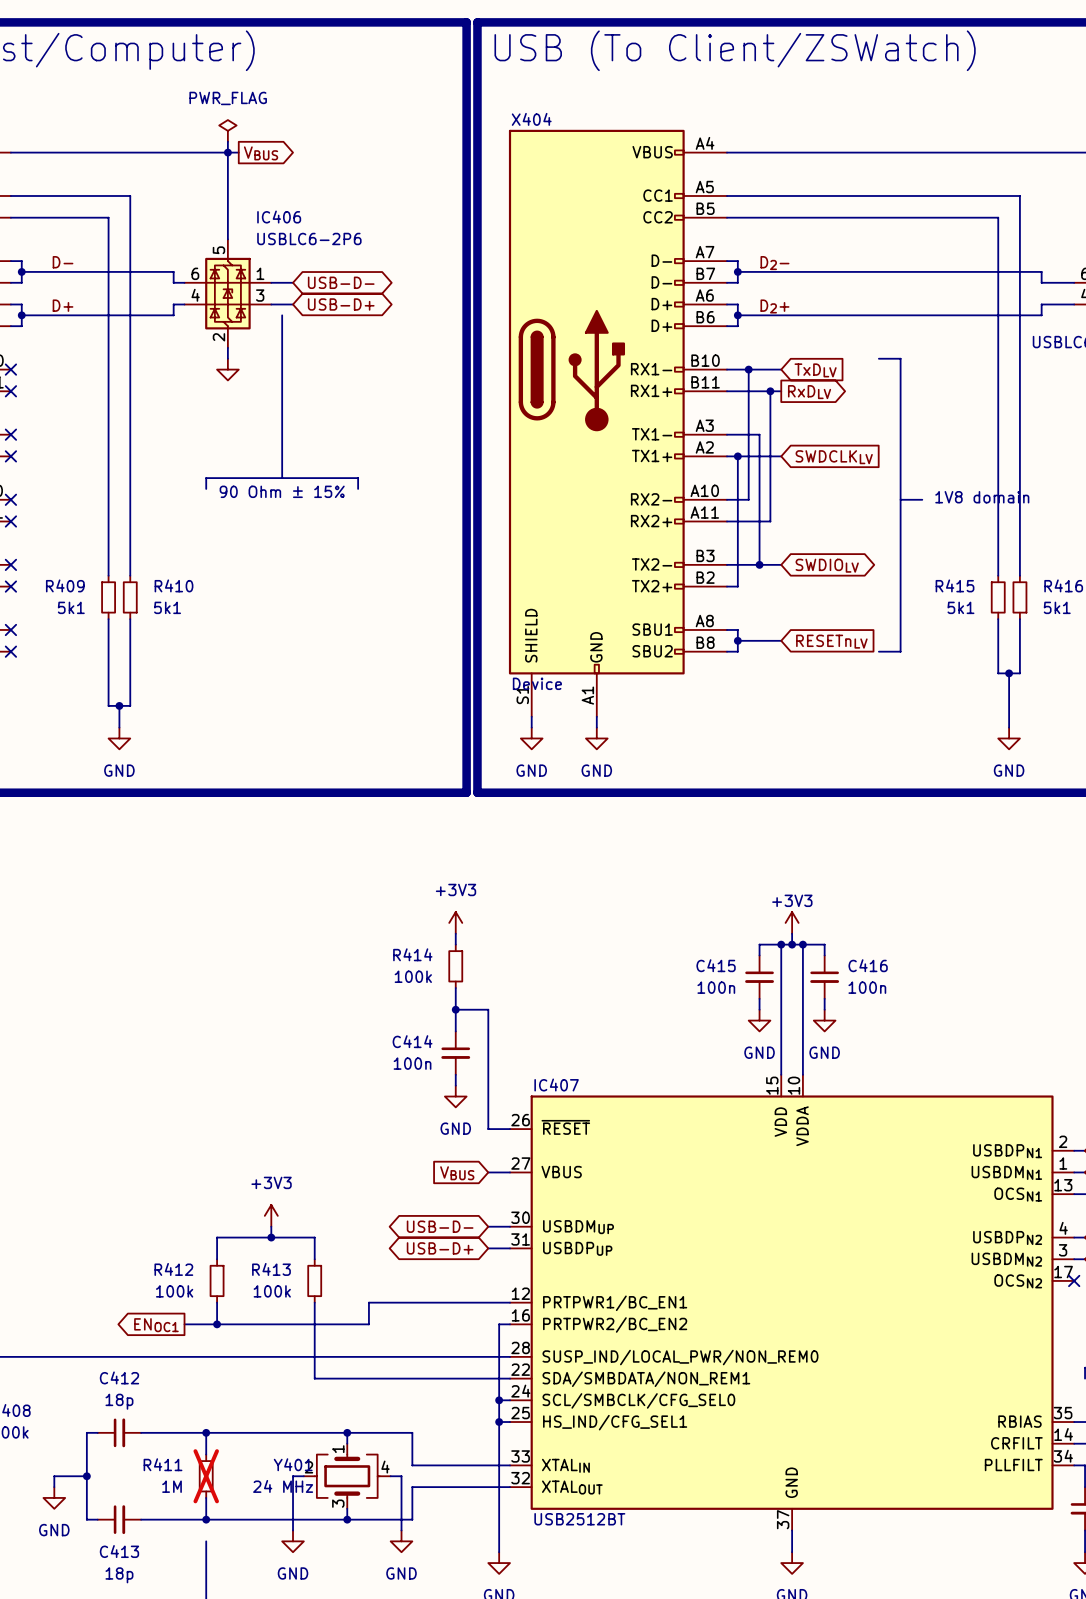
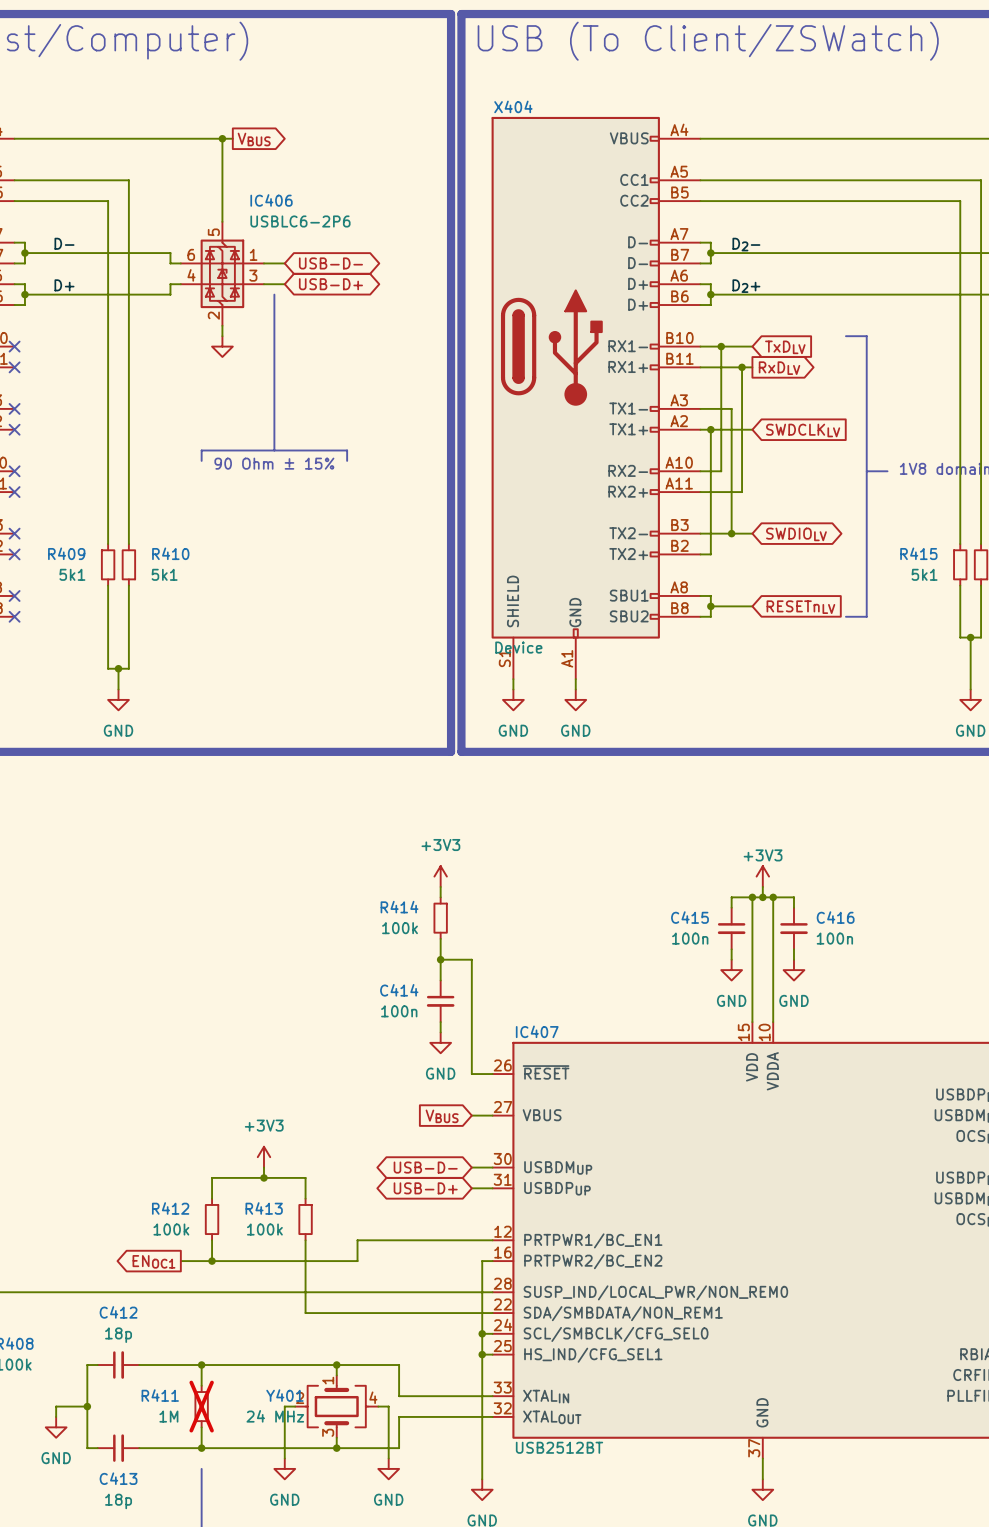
power symbol: PWR_FLAG (227, 130) -> none
wire: (227, 141) (227, 152) -> none

